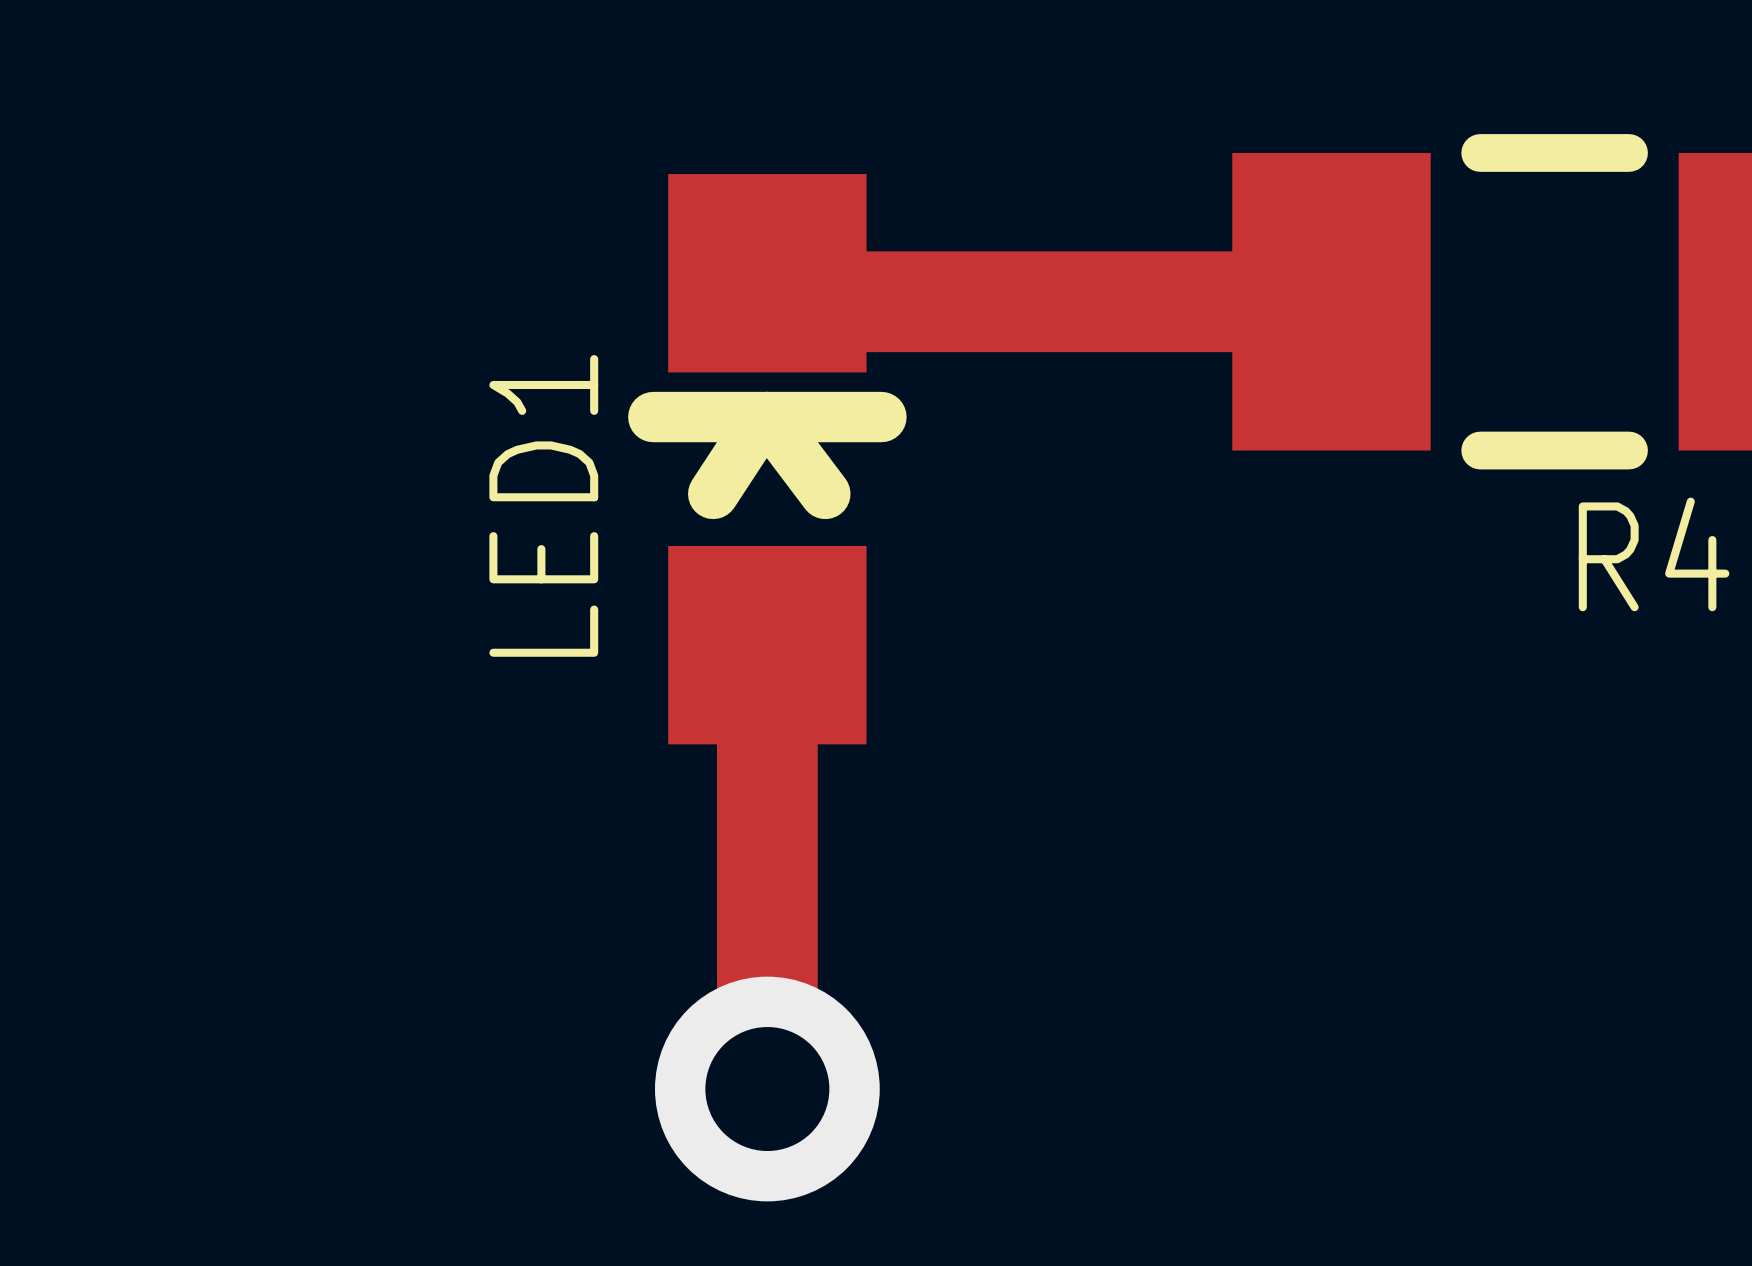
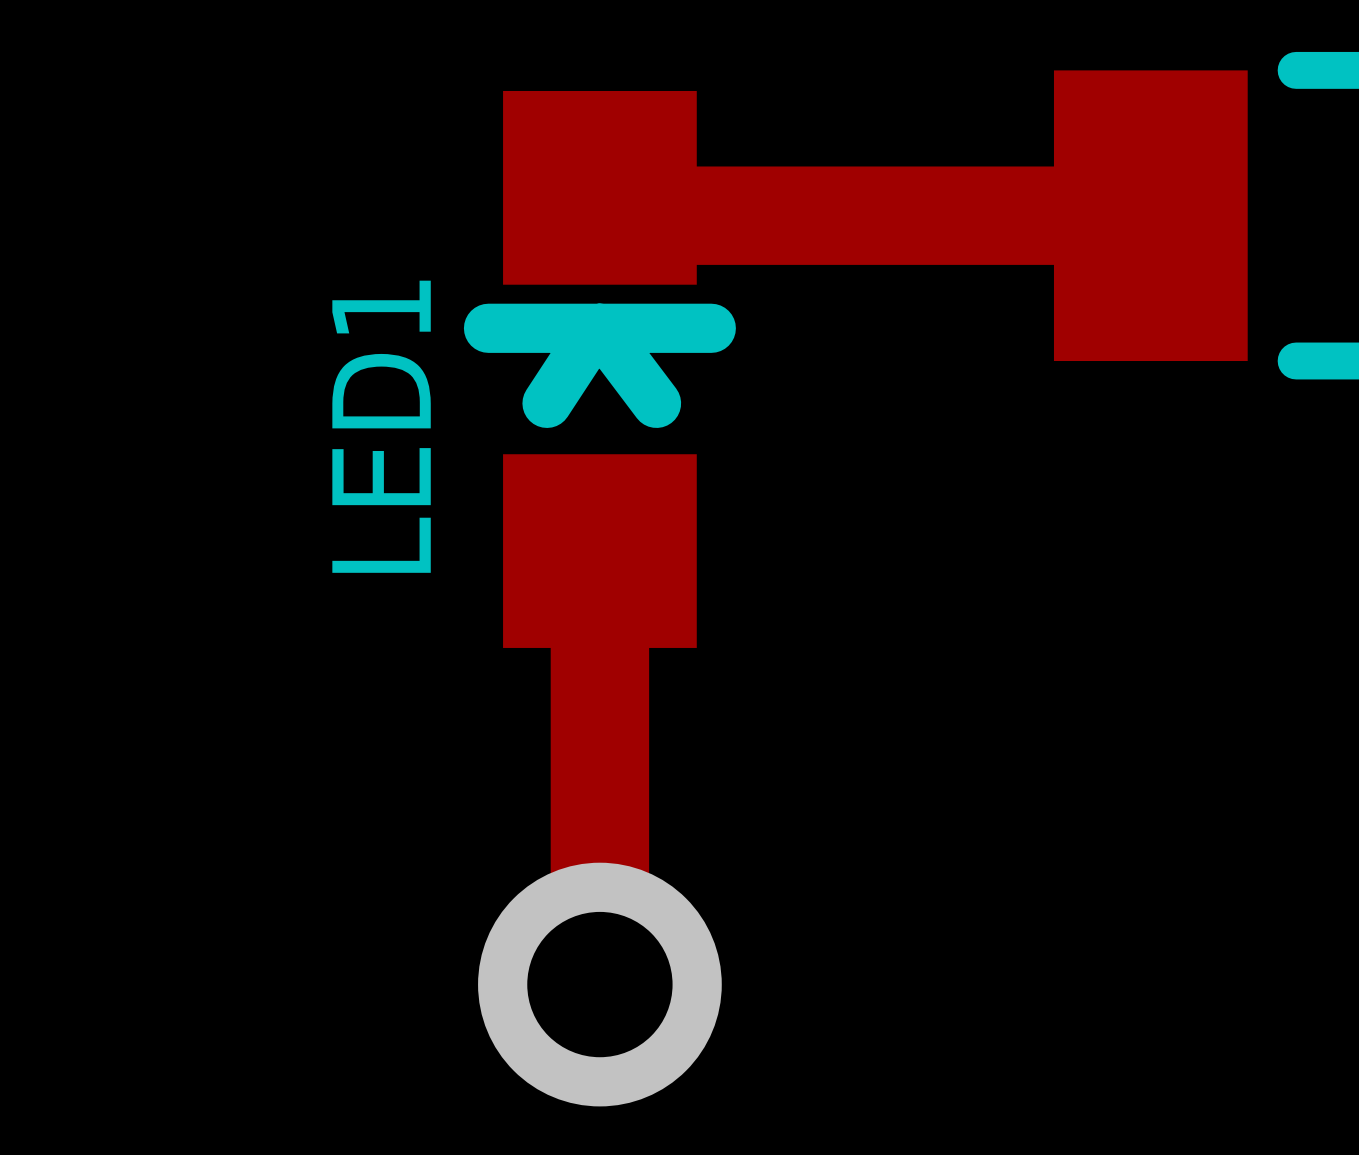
via size: [654, 976, 880, 1202] -> [478, 862, 722, 1107]

